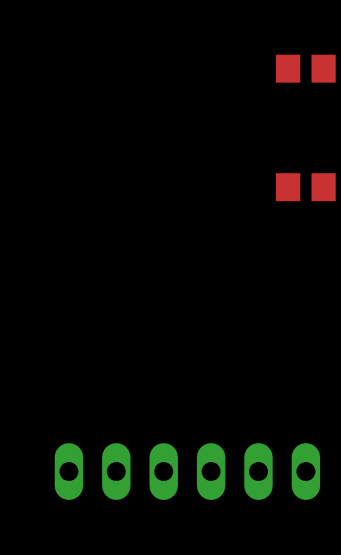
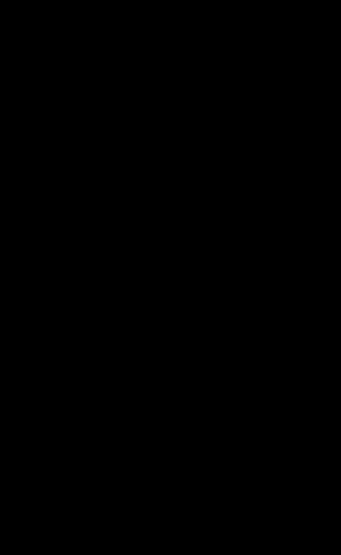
part: (305, 68) -> none
part: (305, 187) -> none
part: (187, 471) -> none

